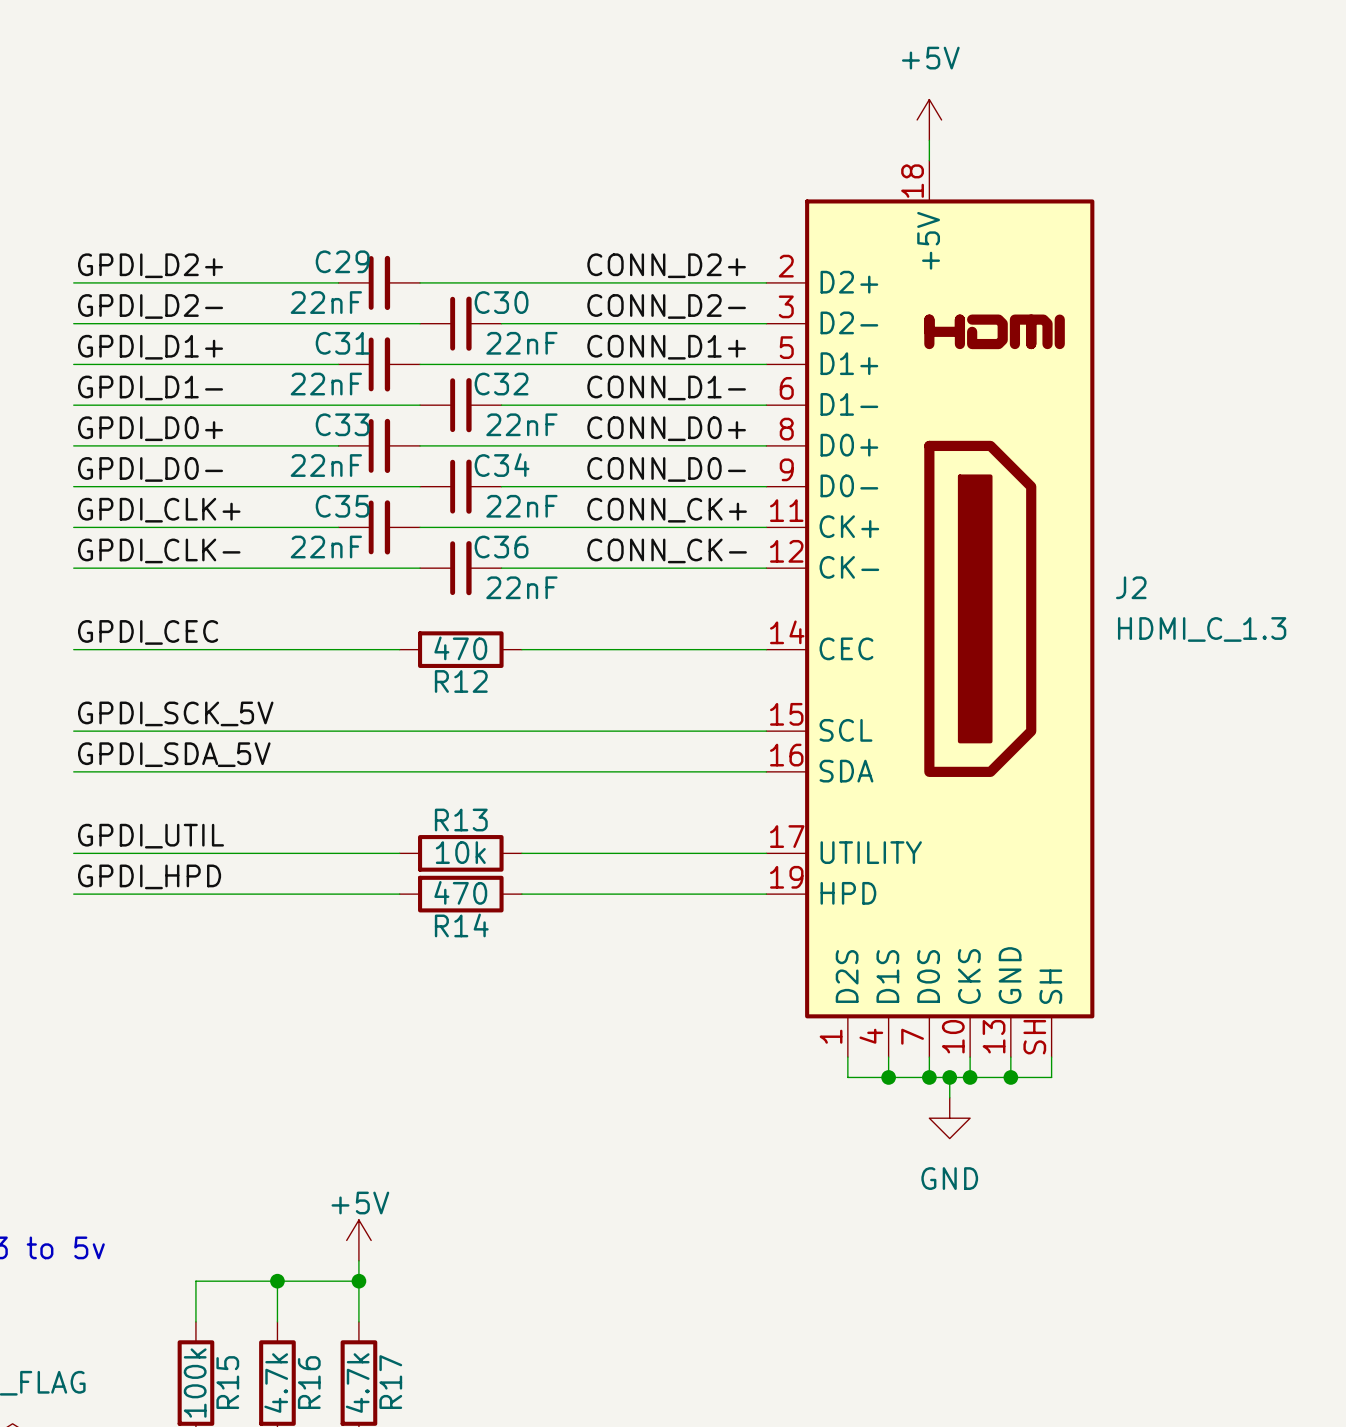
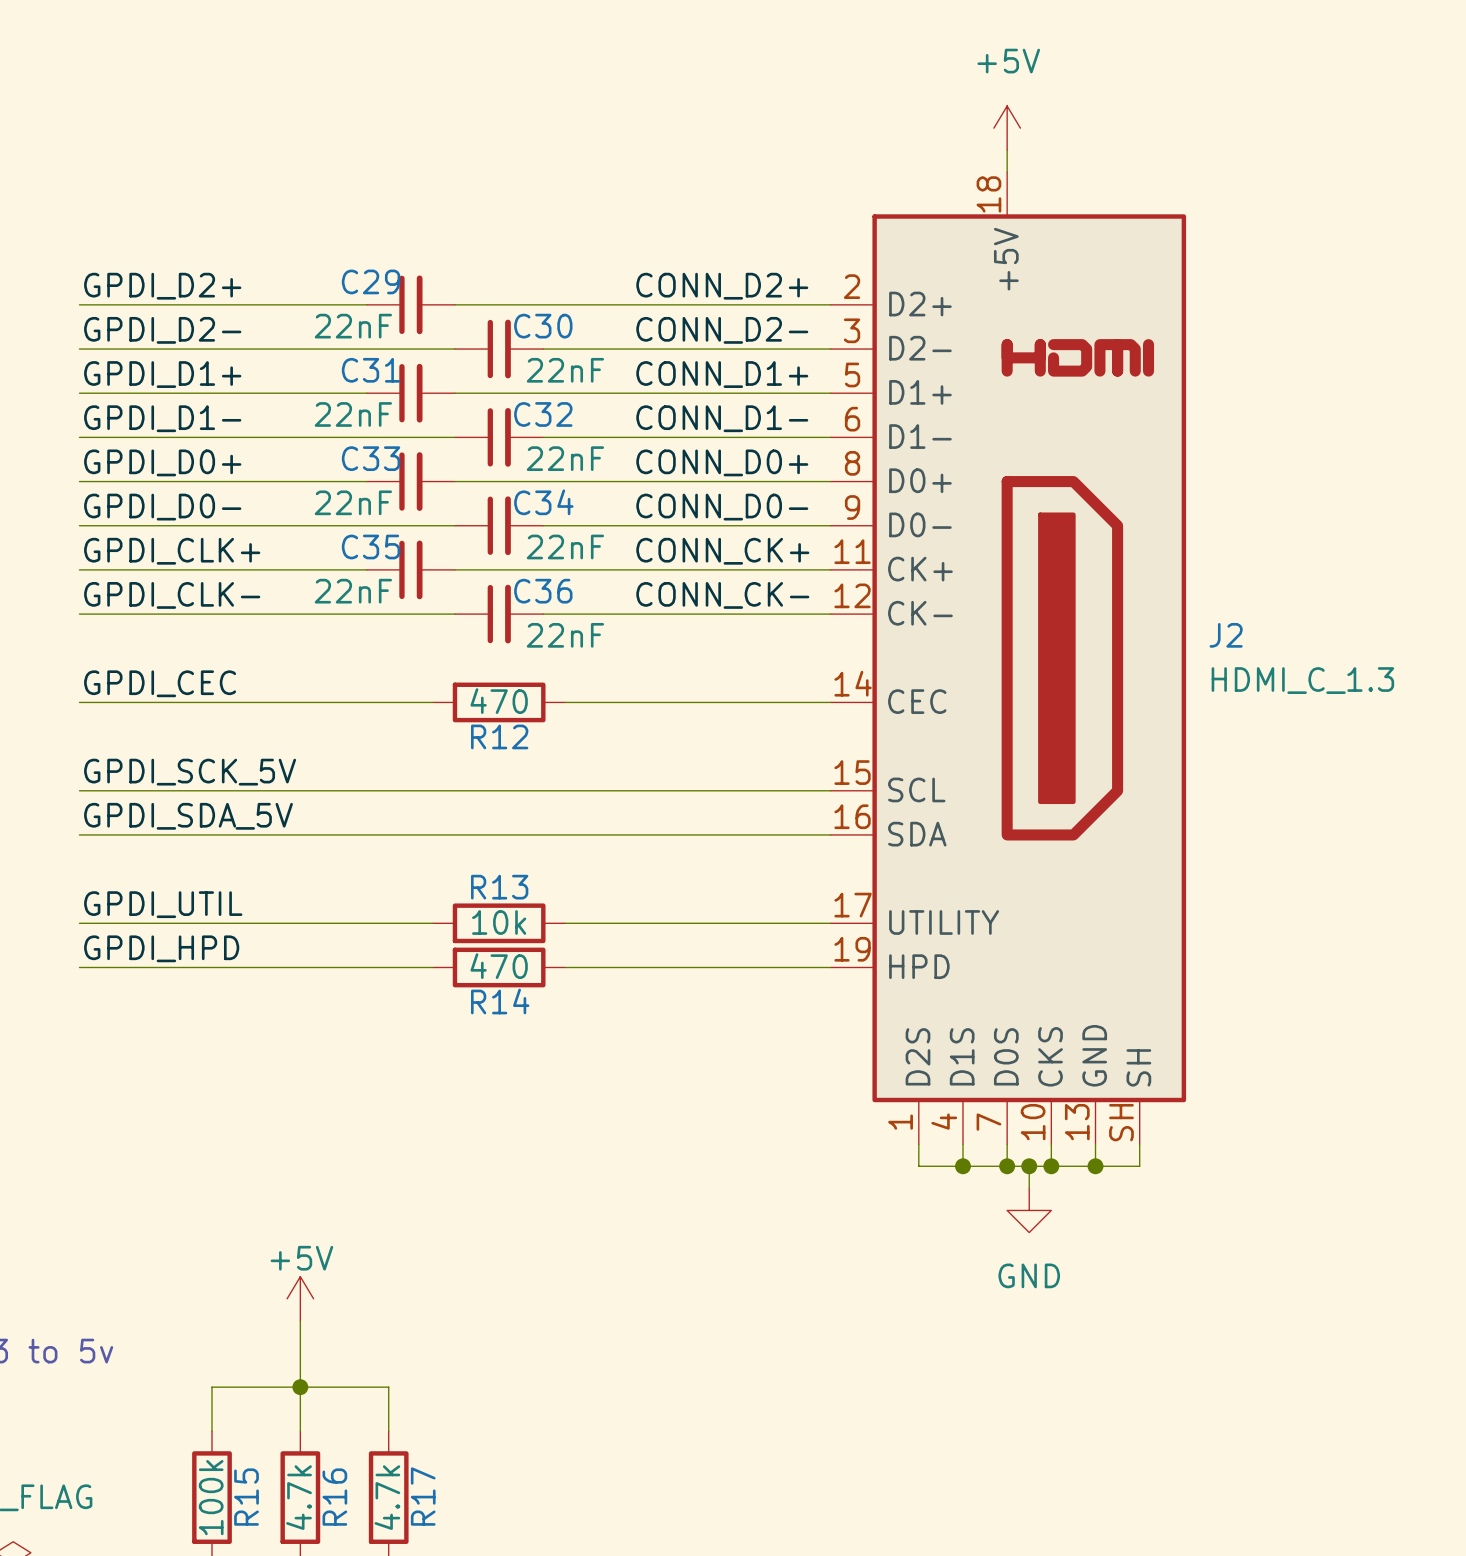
wire: none -> (300, 1320) (300, 1387)
power symbol position: +5V (358, 1240) -> +5V (300, 1298)
wire: (358, 1260) (358, 1281) -> none
junction: (358, 1281) -> none

